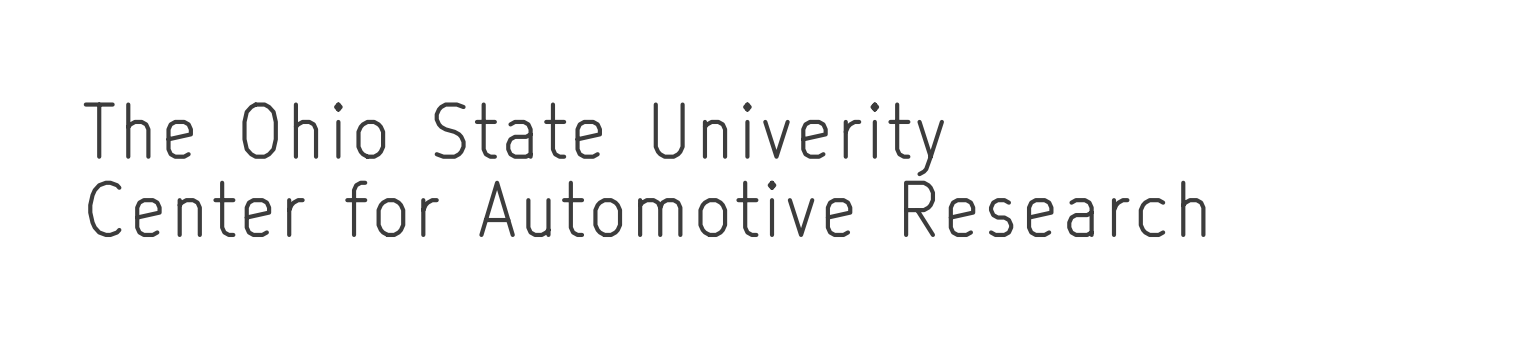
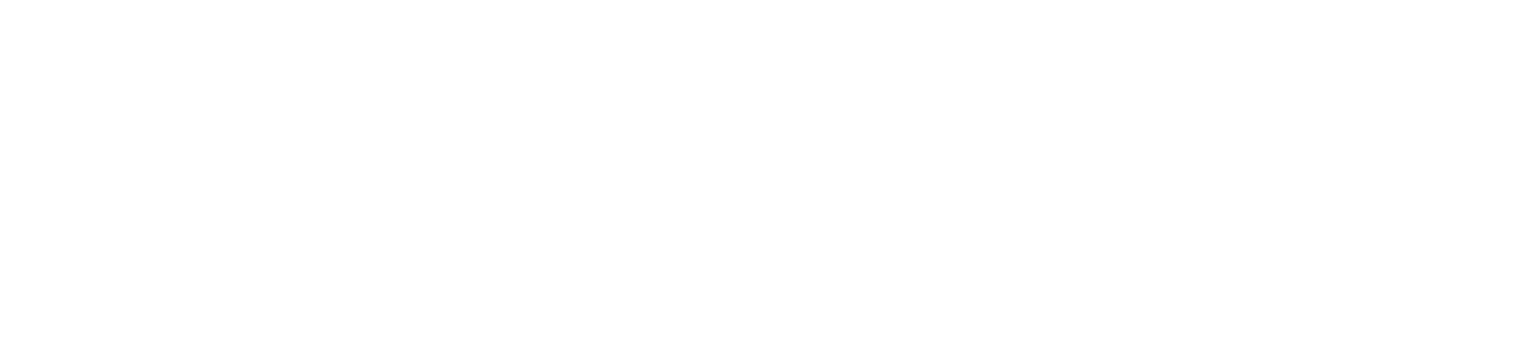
text: The Ohio State Univerity (513, 139) -> none
text: Center for Automotive Research (646, 208) -> none

